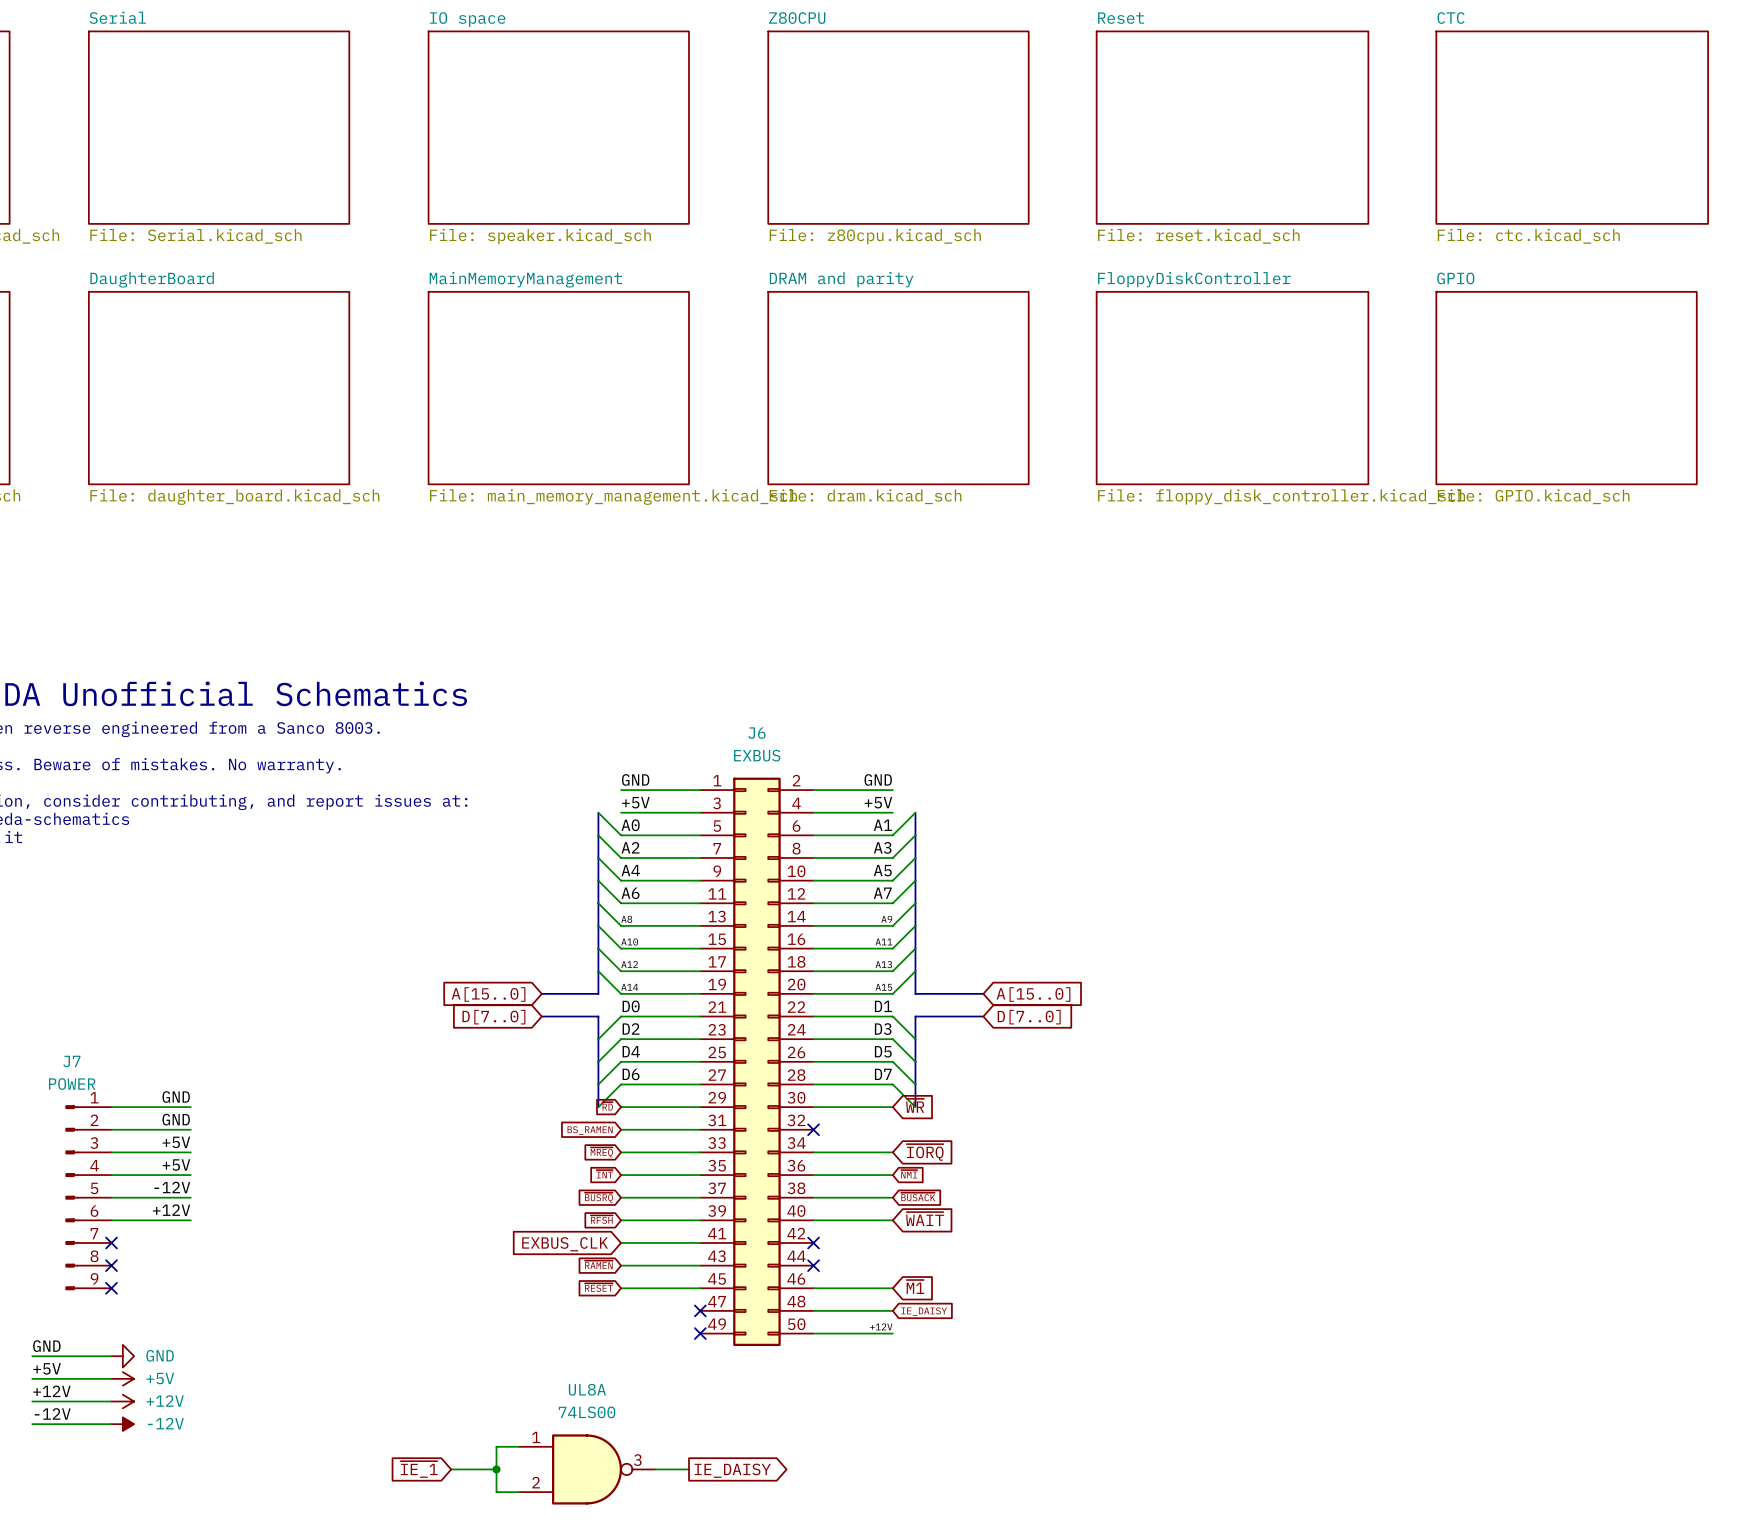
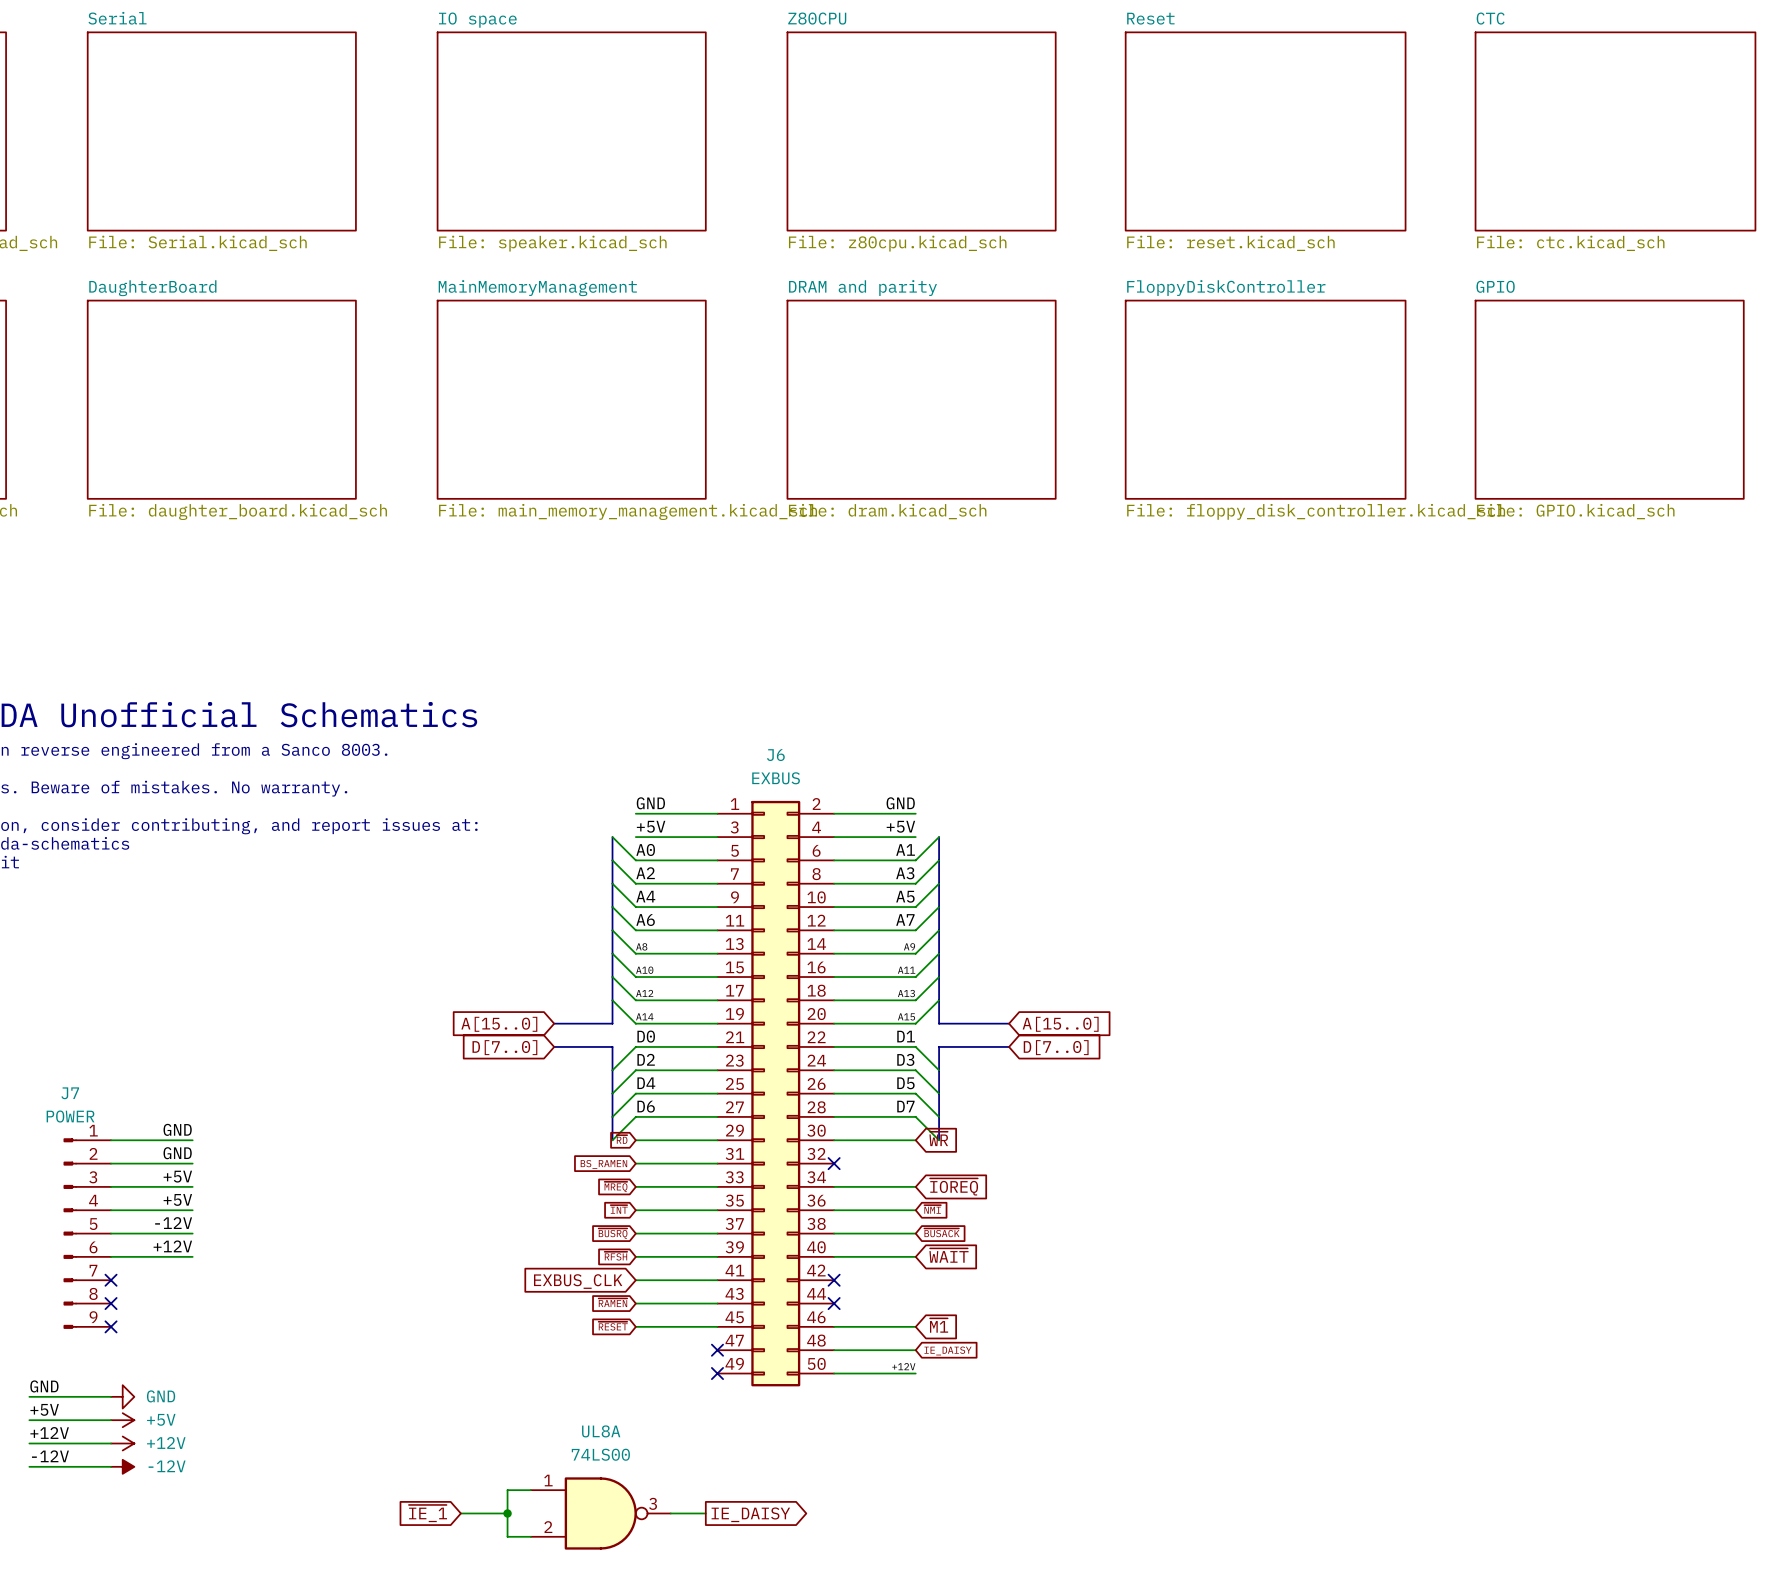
global label: ~{IORQ} (925, 1152) -> ~{IOREQ} (954, 1186)

